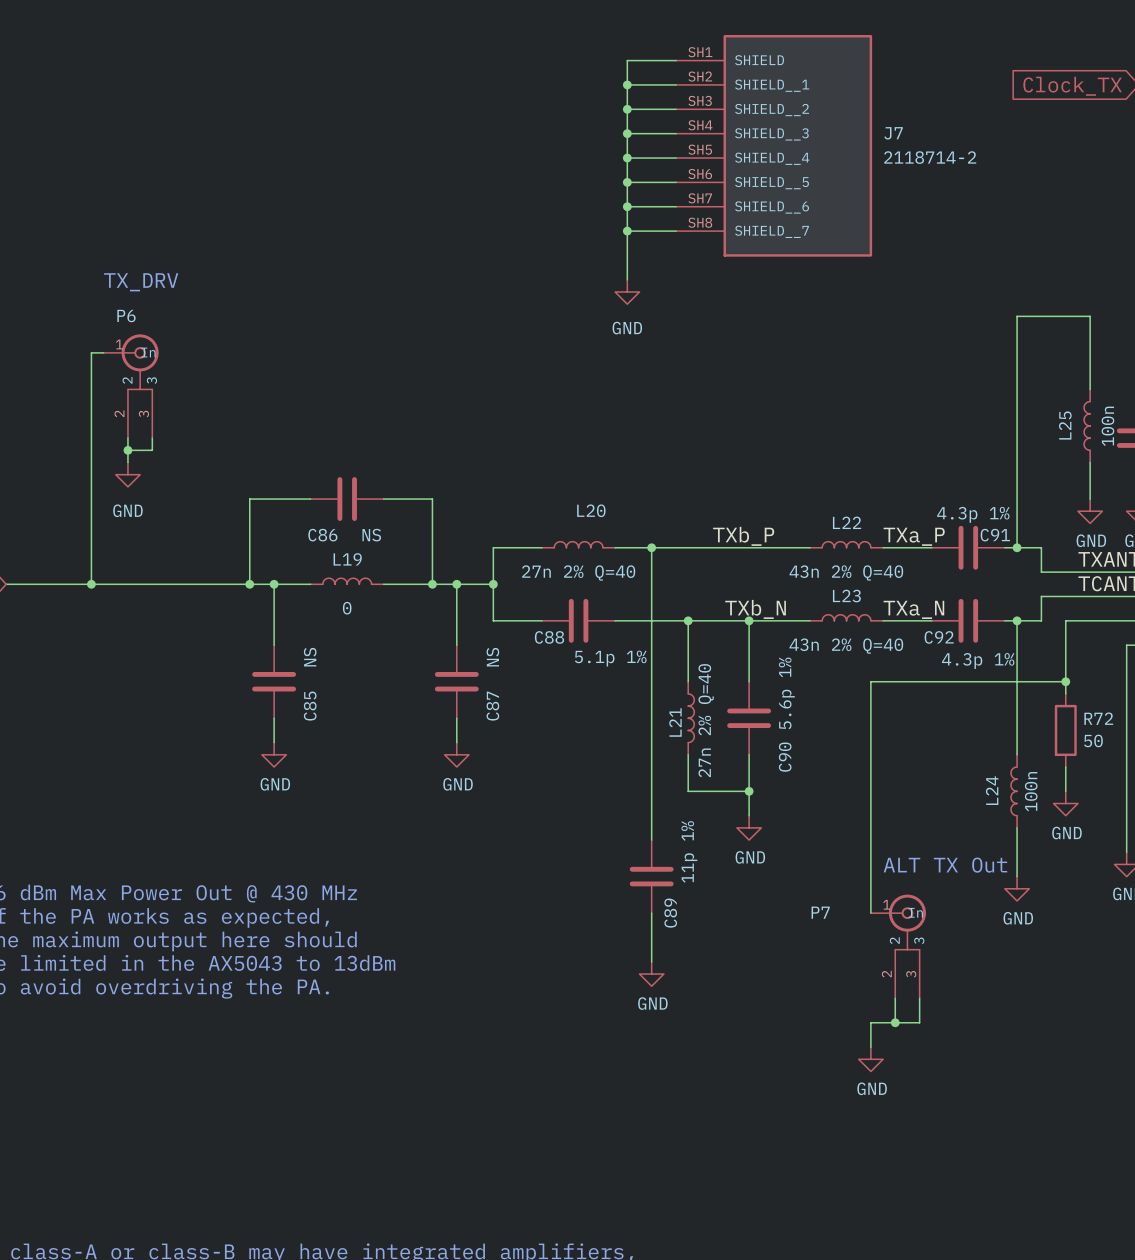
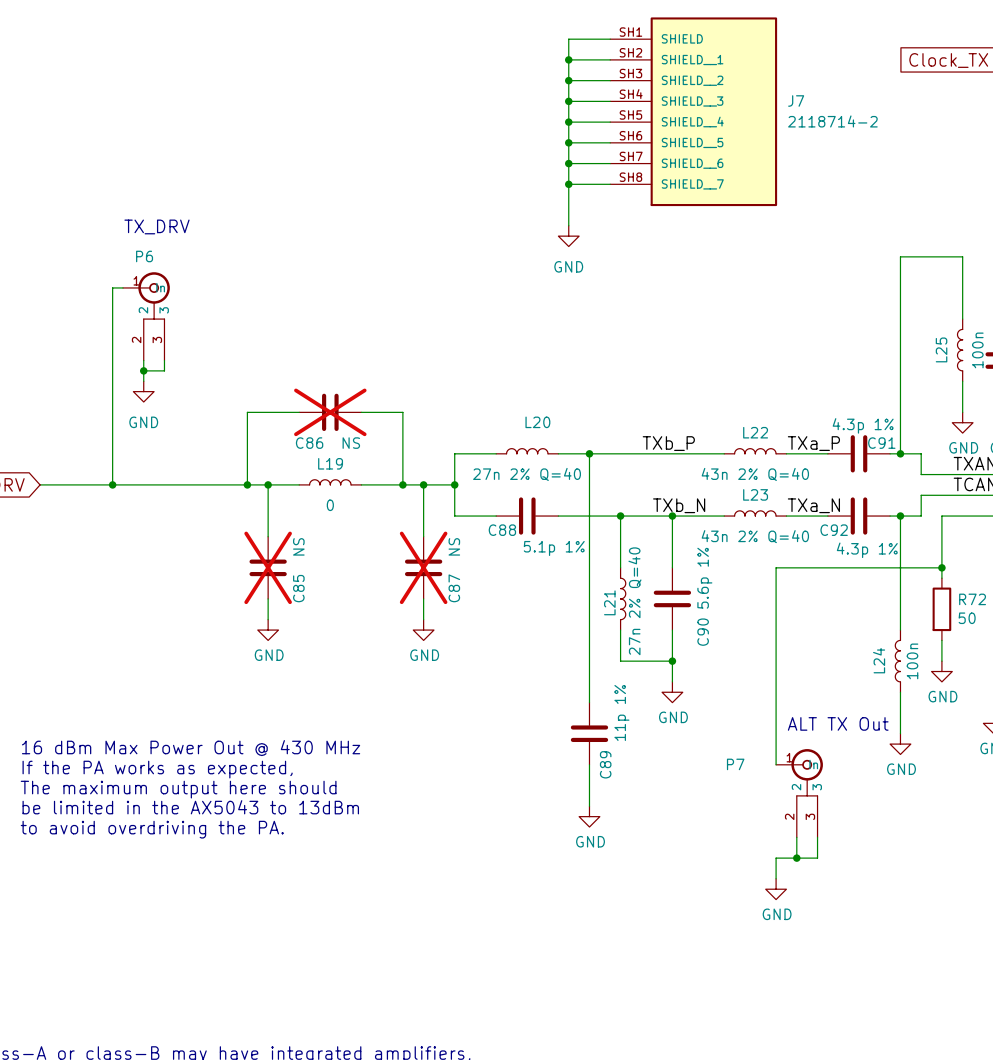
C86 do-not-place cross: none -> (330, 412)
C85 do-not-place cross: none -> (268, 567)
C87 do-not-place cross: none -> (423, 567)

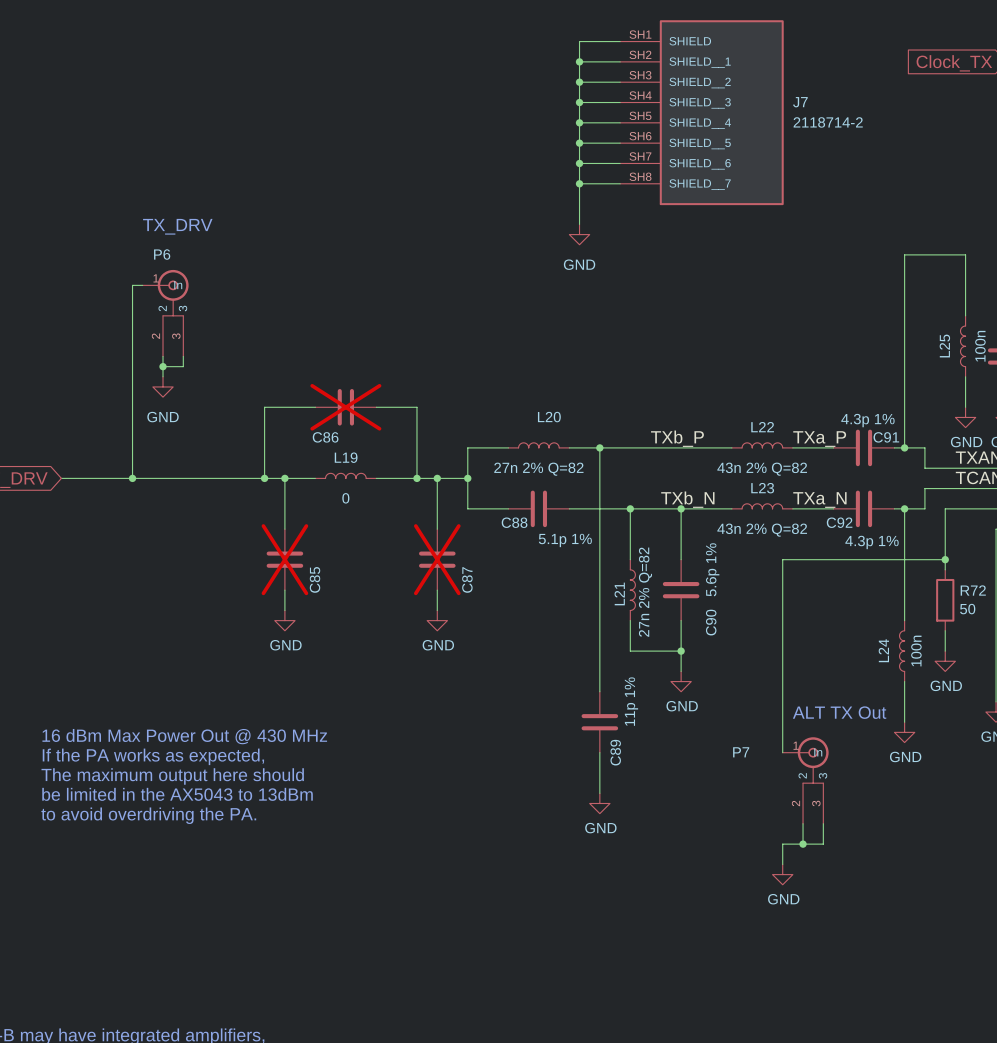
C86 value: NS (351, 443) -> none
L20 value: 27n 2% Q=40 (527, 474) -> 27n 2% Q=82 (538, 469)
L22 value: 43n 2% Q=40 (755, 474) -> 43n 2% Q=82 (762, 469)
L23 value: 43n 2% Q=40 (755, 536) -> 43n 2% Q=82 (762, 530)
C85 value: NS (298, 546) -> none
C87 value: NS (454, 546) -> none
L21 value: 27n 2% Q=40 (634, 601) -> 27n 2% Q=82 (645, 592)

